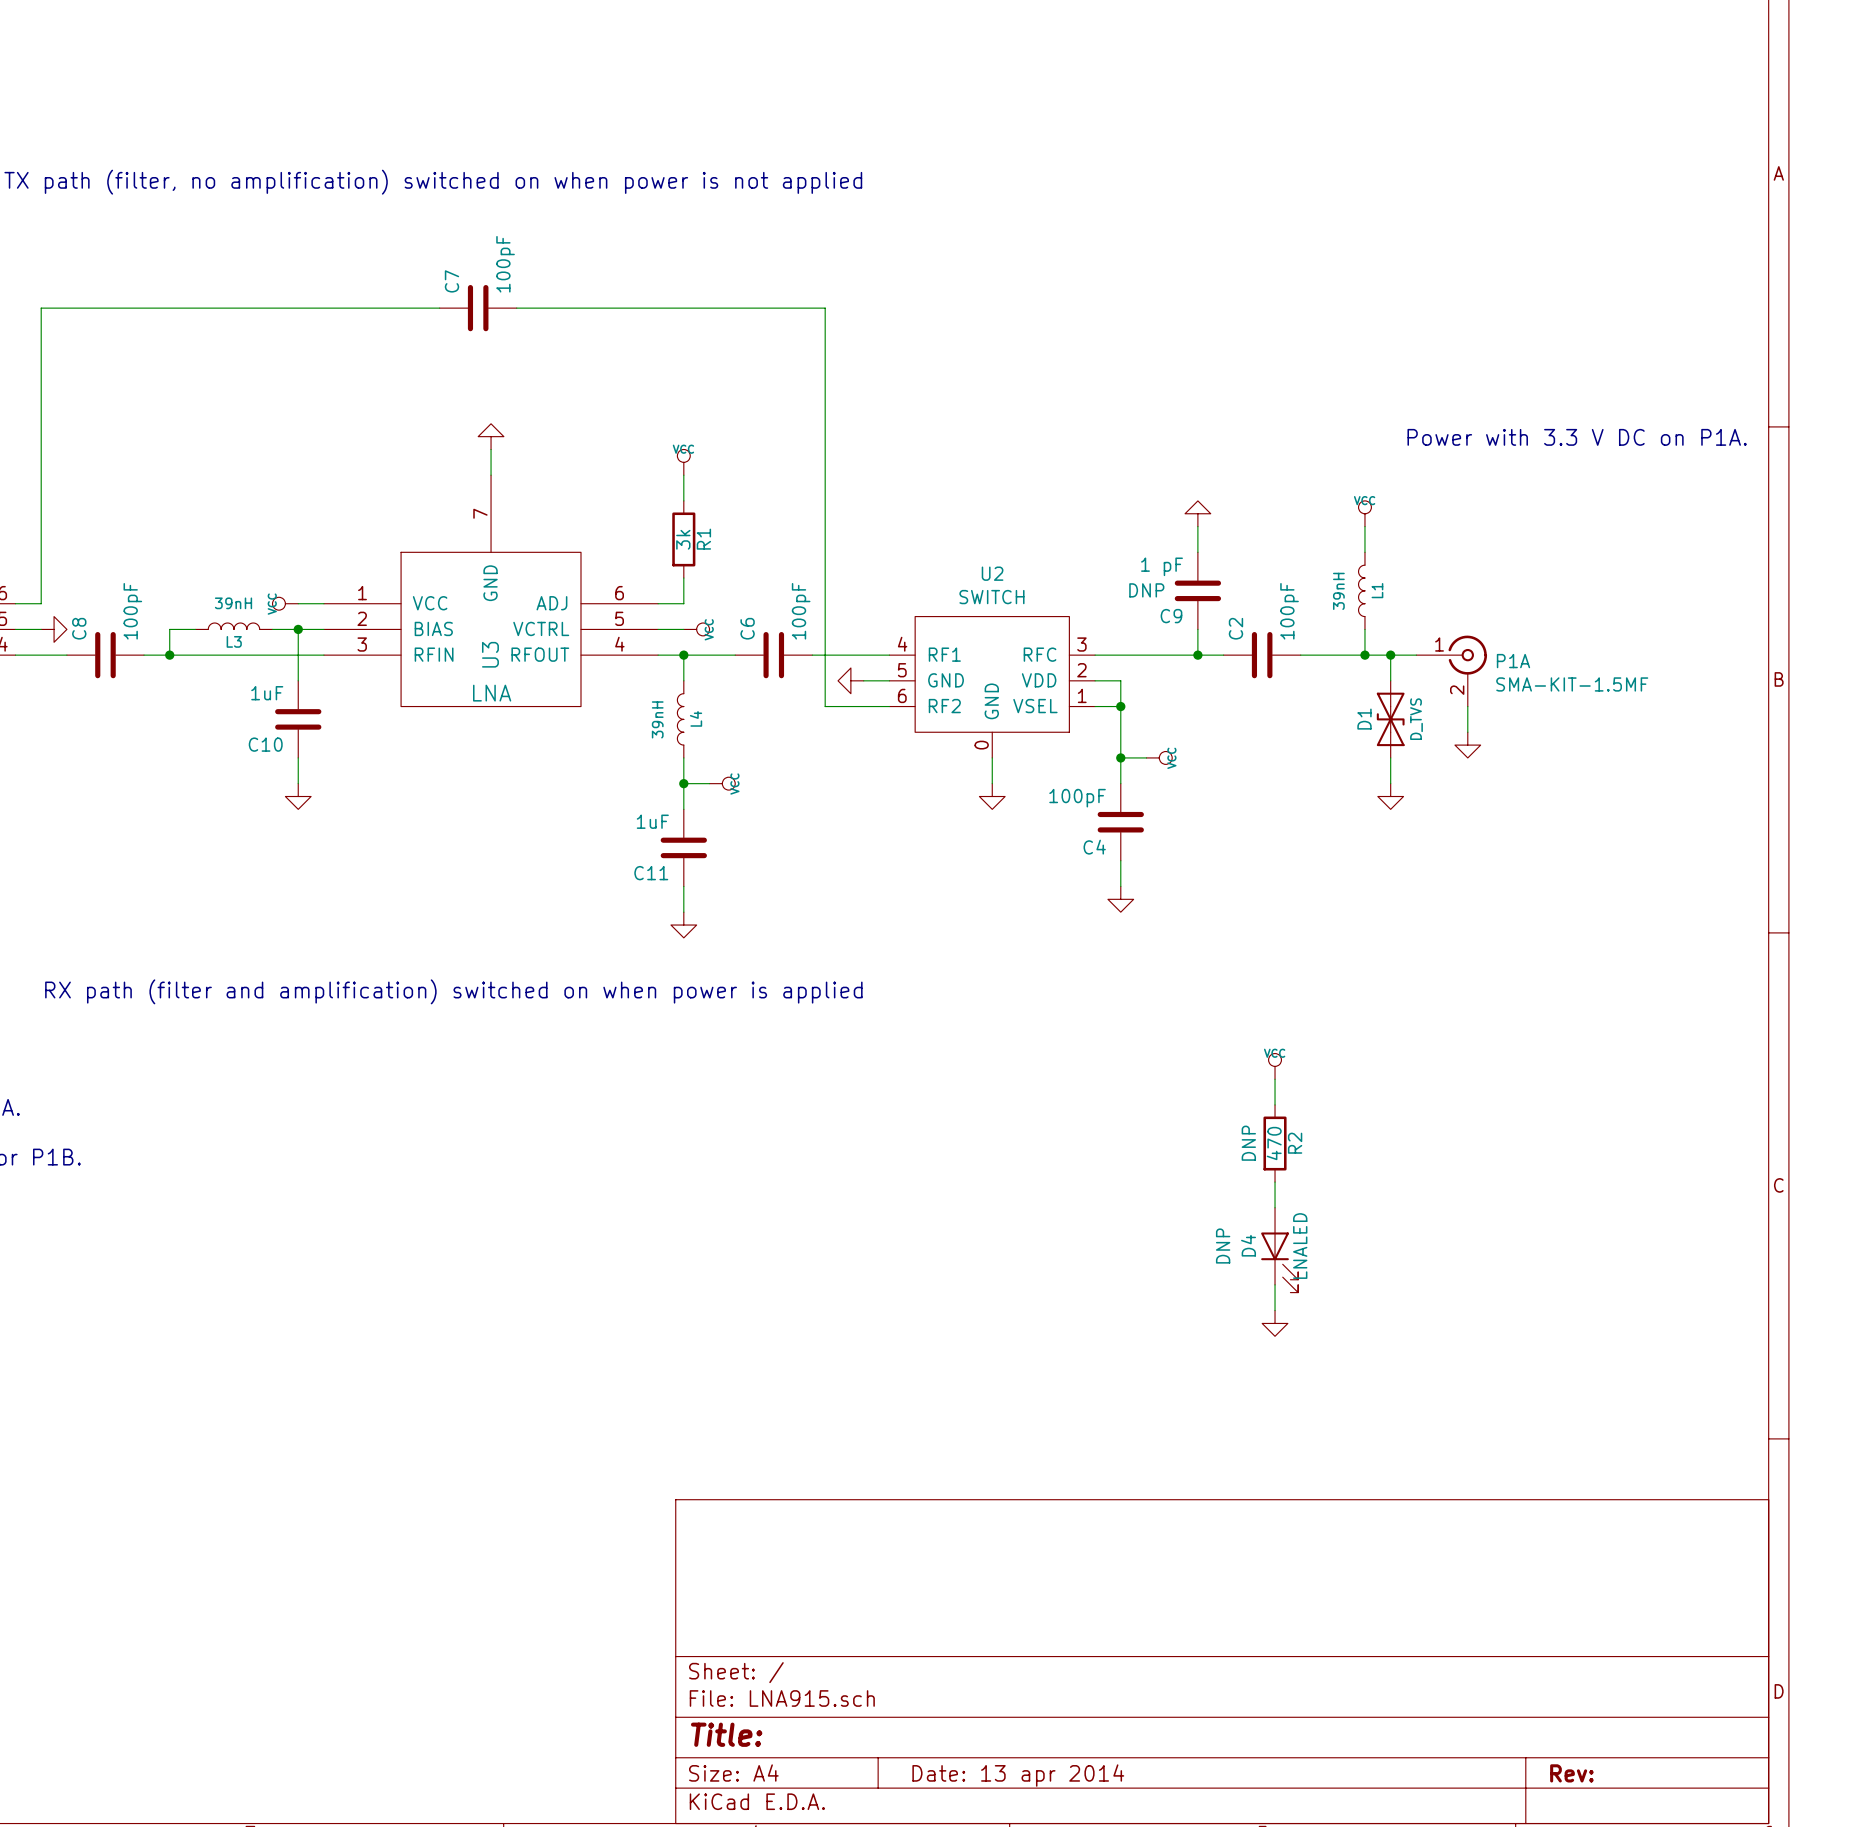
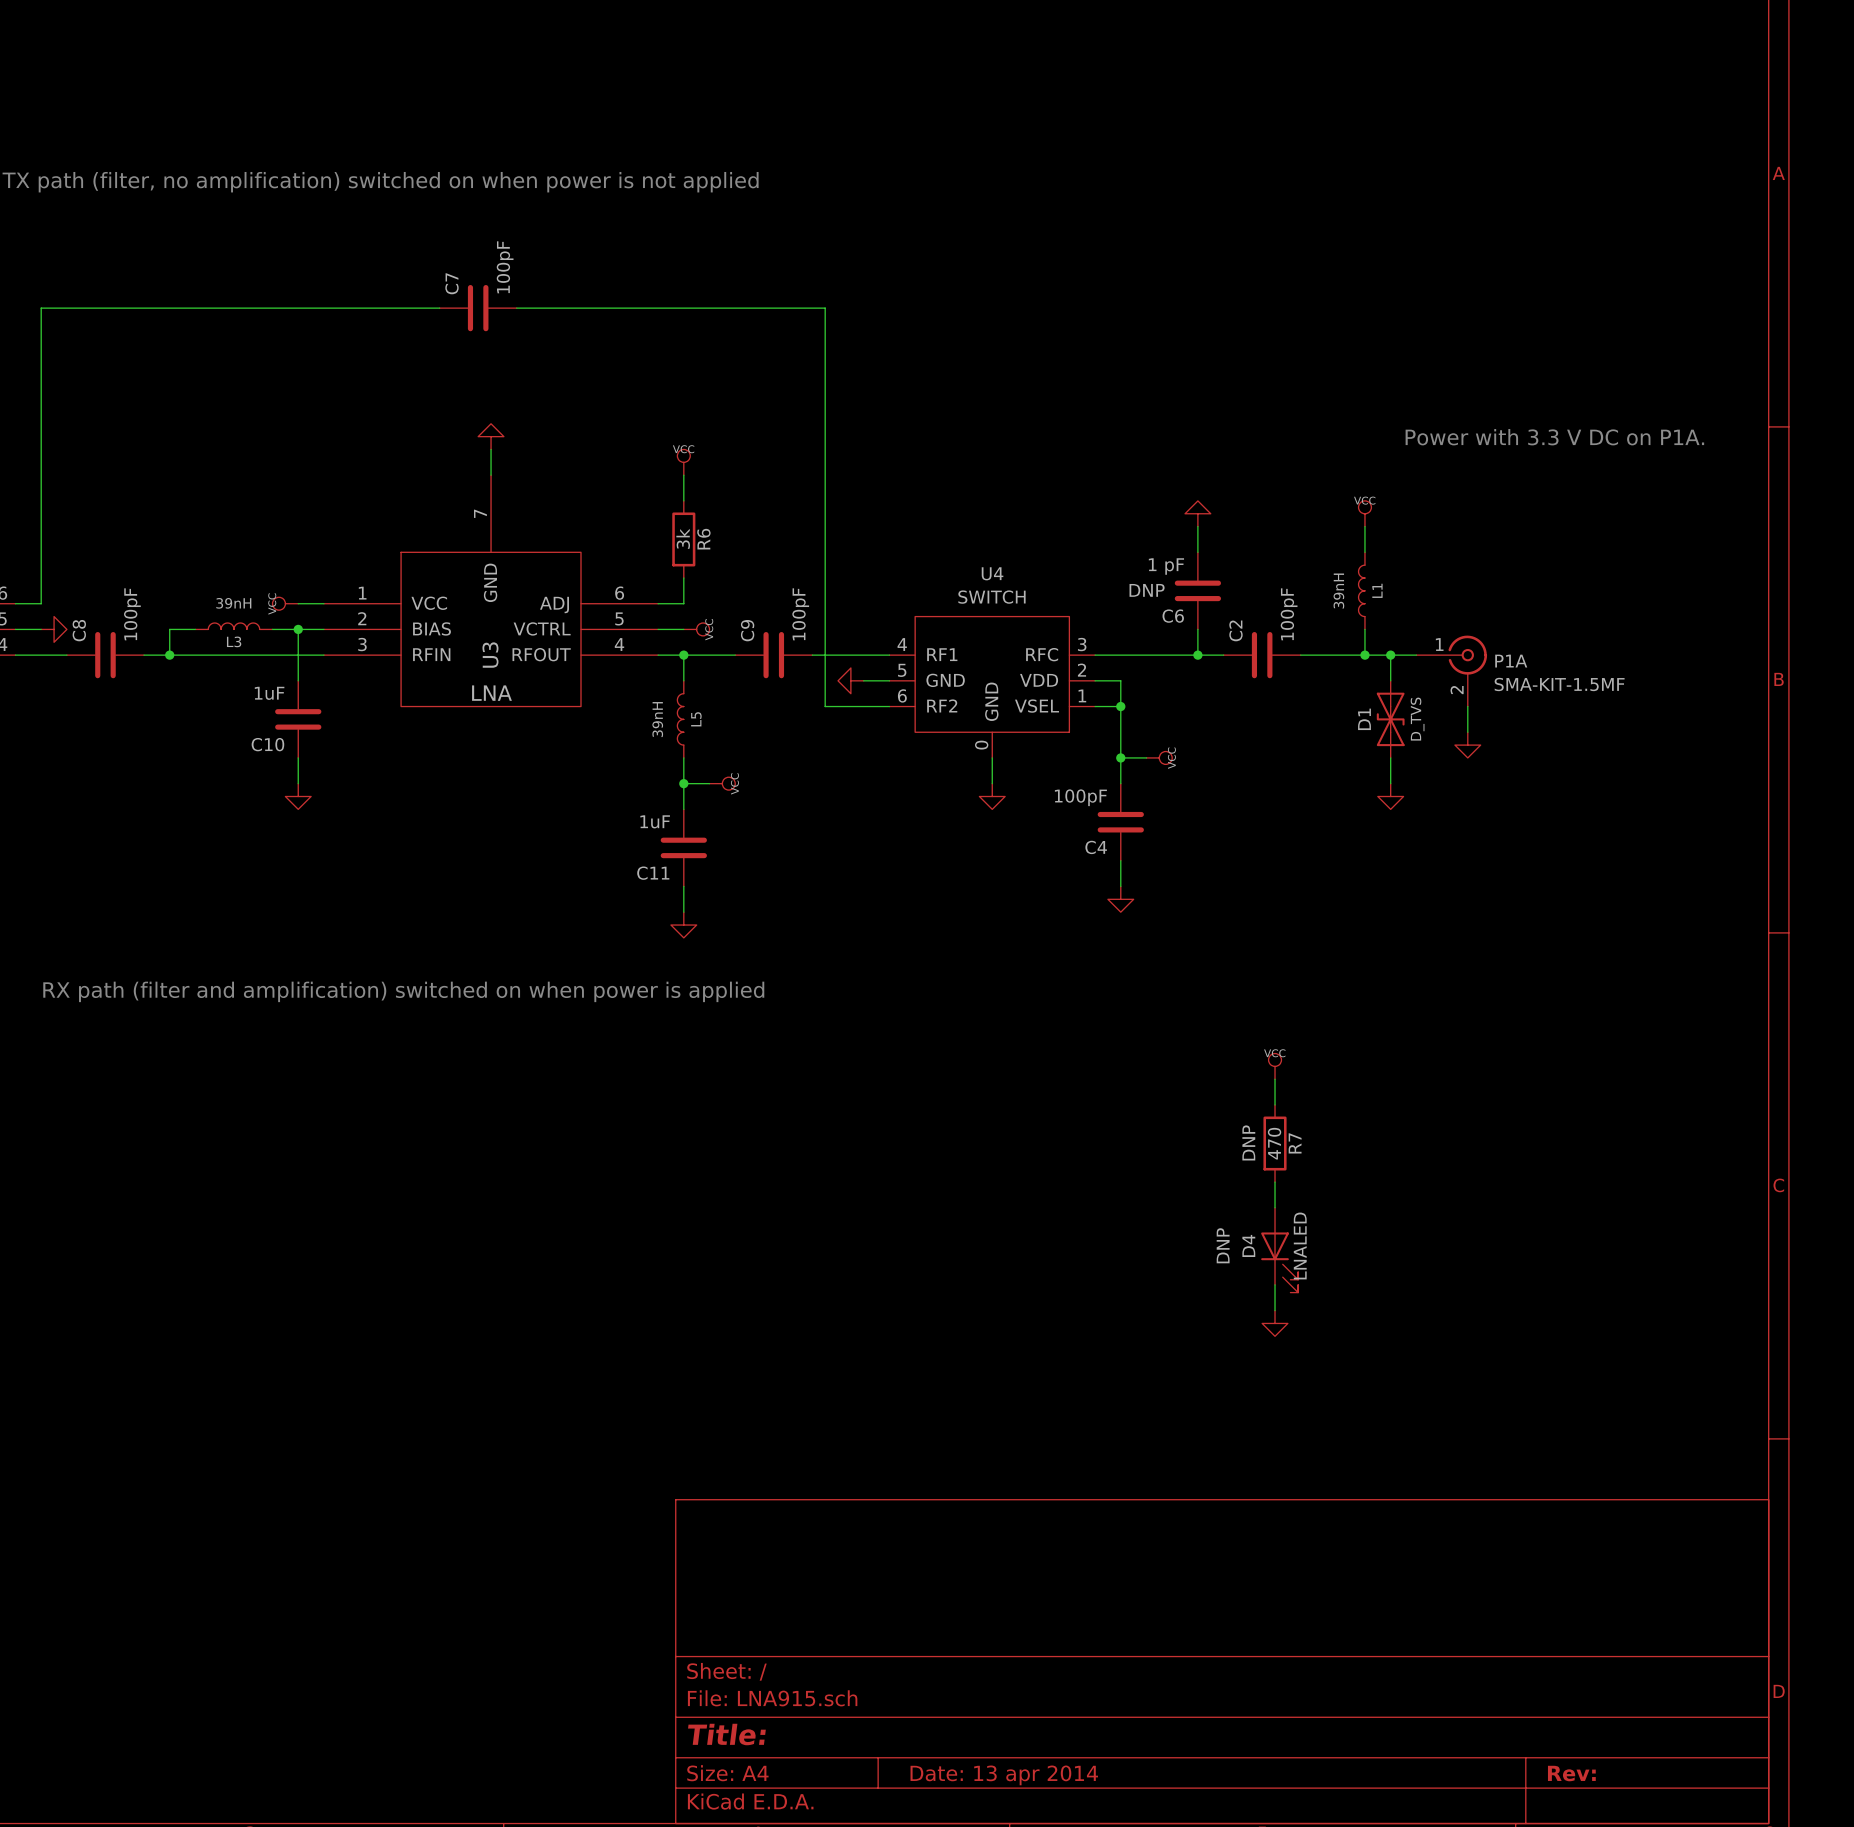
R1 name: R1 (703, 539) -> R6 (703, 539)
U2 name: U2 (992, 573) -> U4 (992, 573)
C9 name: C9 (1171, 616) -> C6 (1173, 616)
C6 name: C6 (747, 628) -> C9 (747, 630)
L4 name: L4 (696, 718) -> L5 (696, 719)
R2 name: R2 (1295, 1143) -> R7 (1295, 1143)

